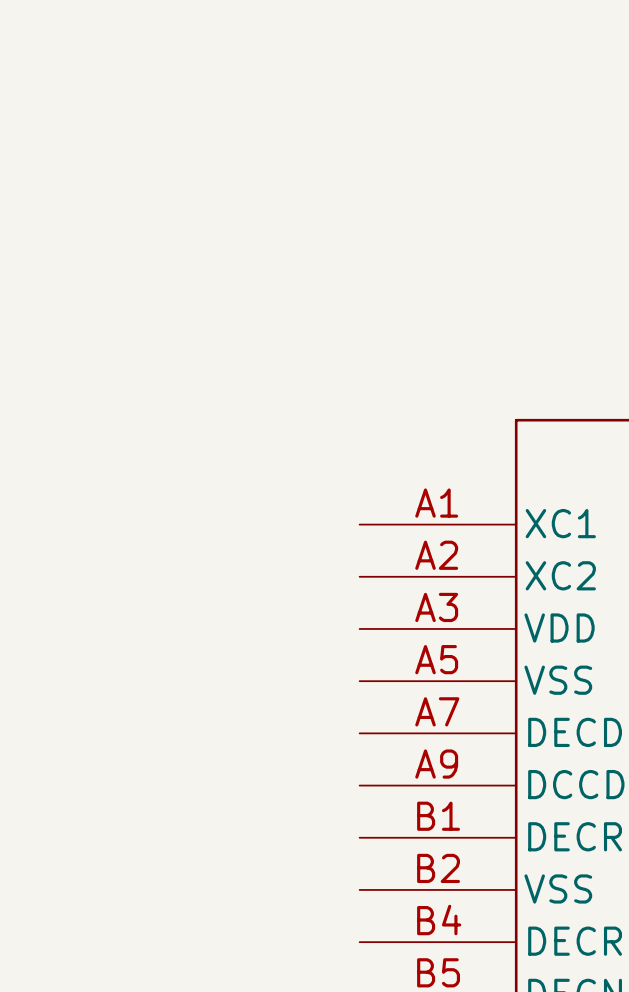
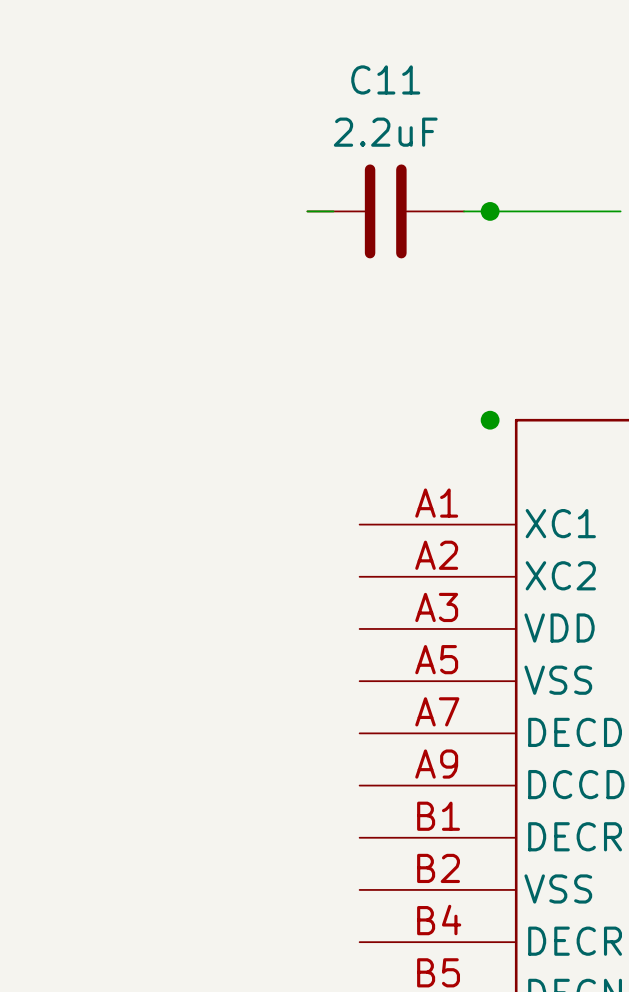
wire: none -> (307, 211) (333, 211)
C11: none -> 2.2uF (385, 211)
wire: none -> (464, 211) (620, 211)
junction: none -> (490, 211)
junction: none -> (490, 420)

